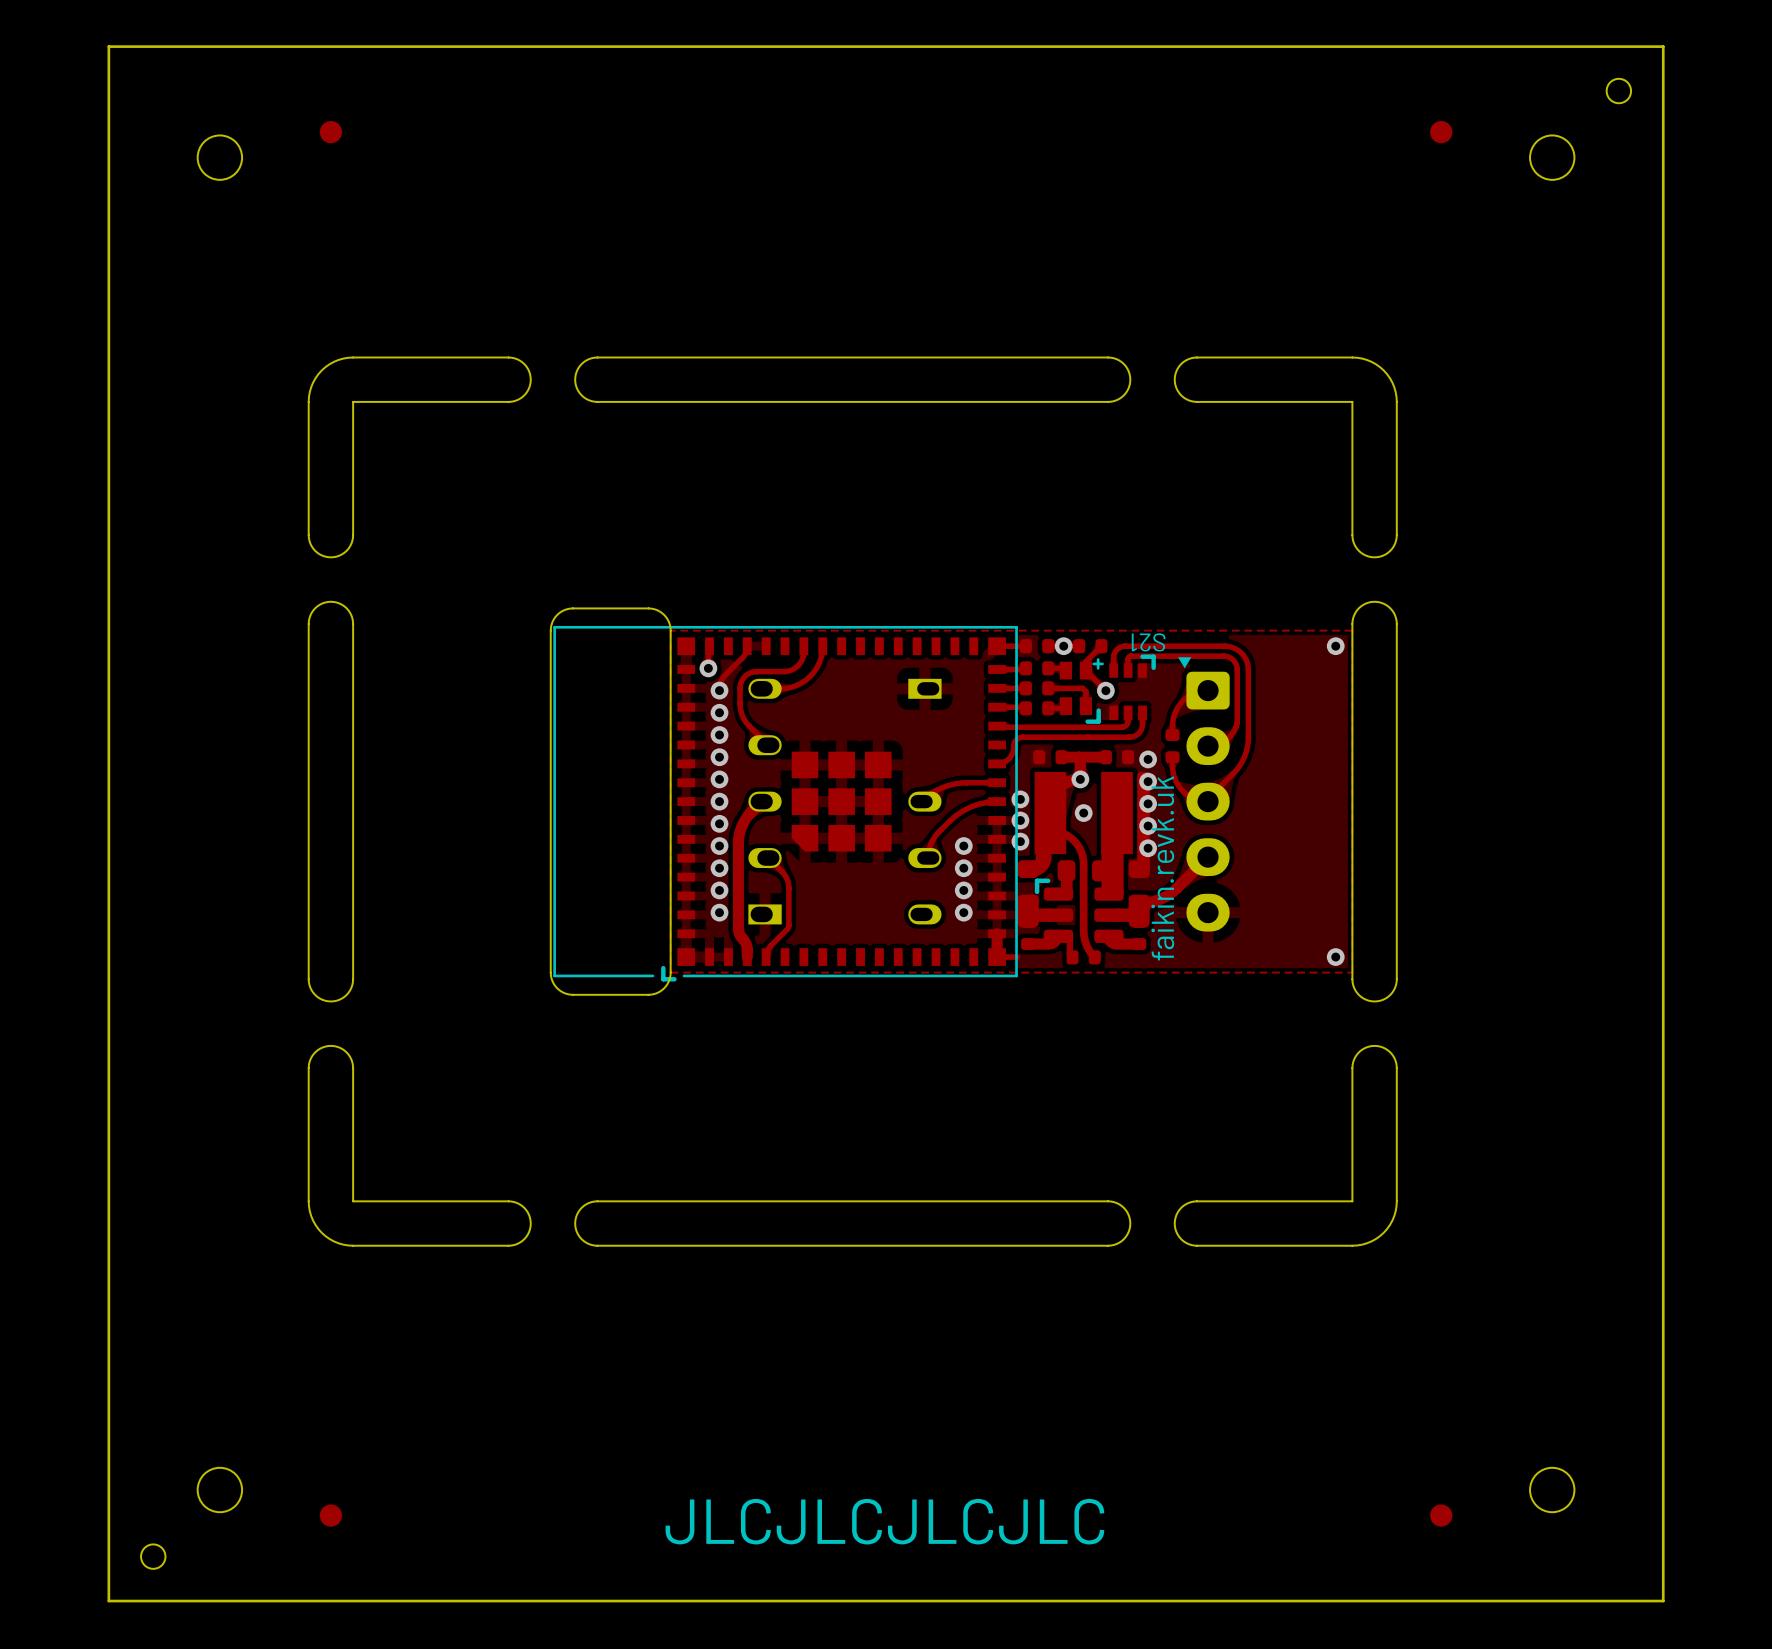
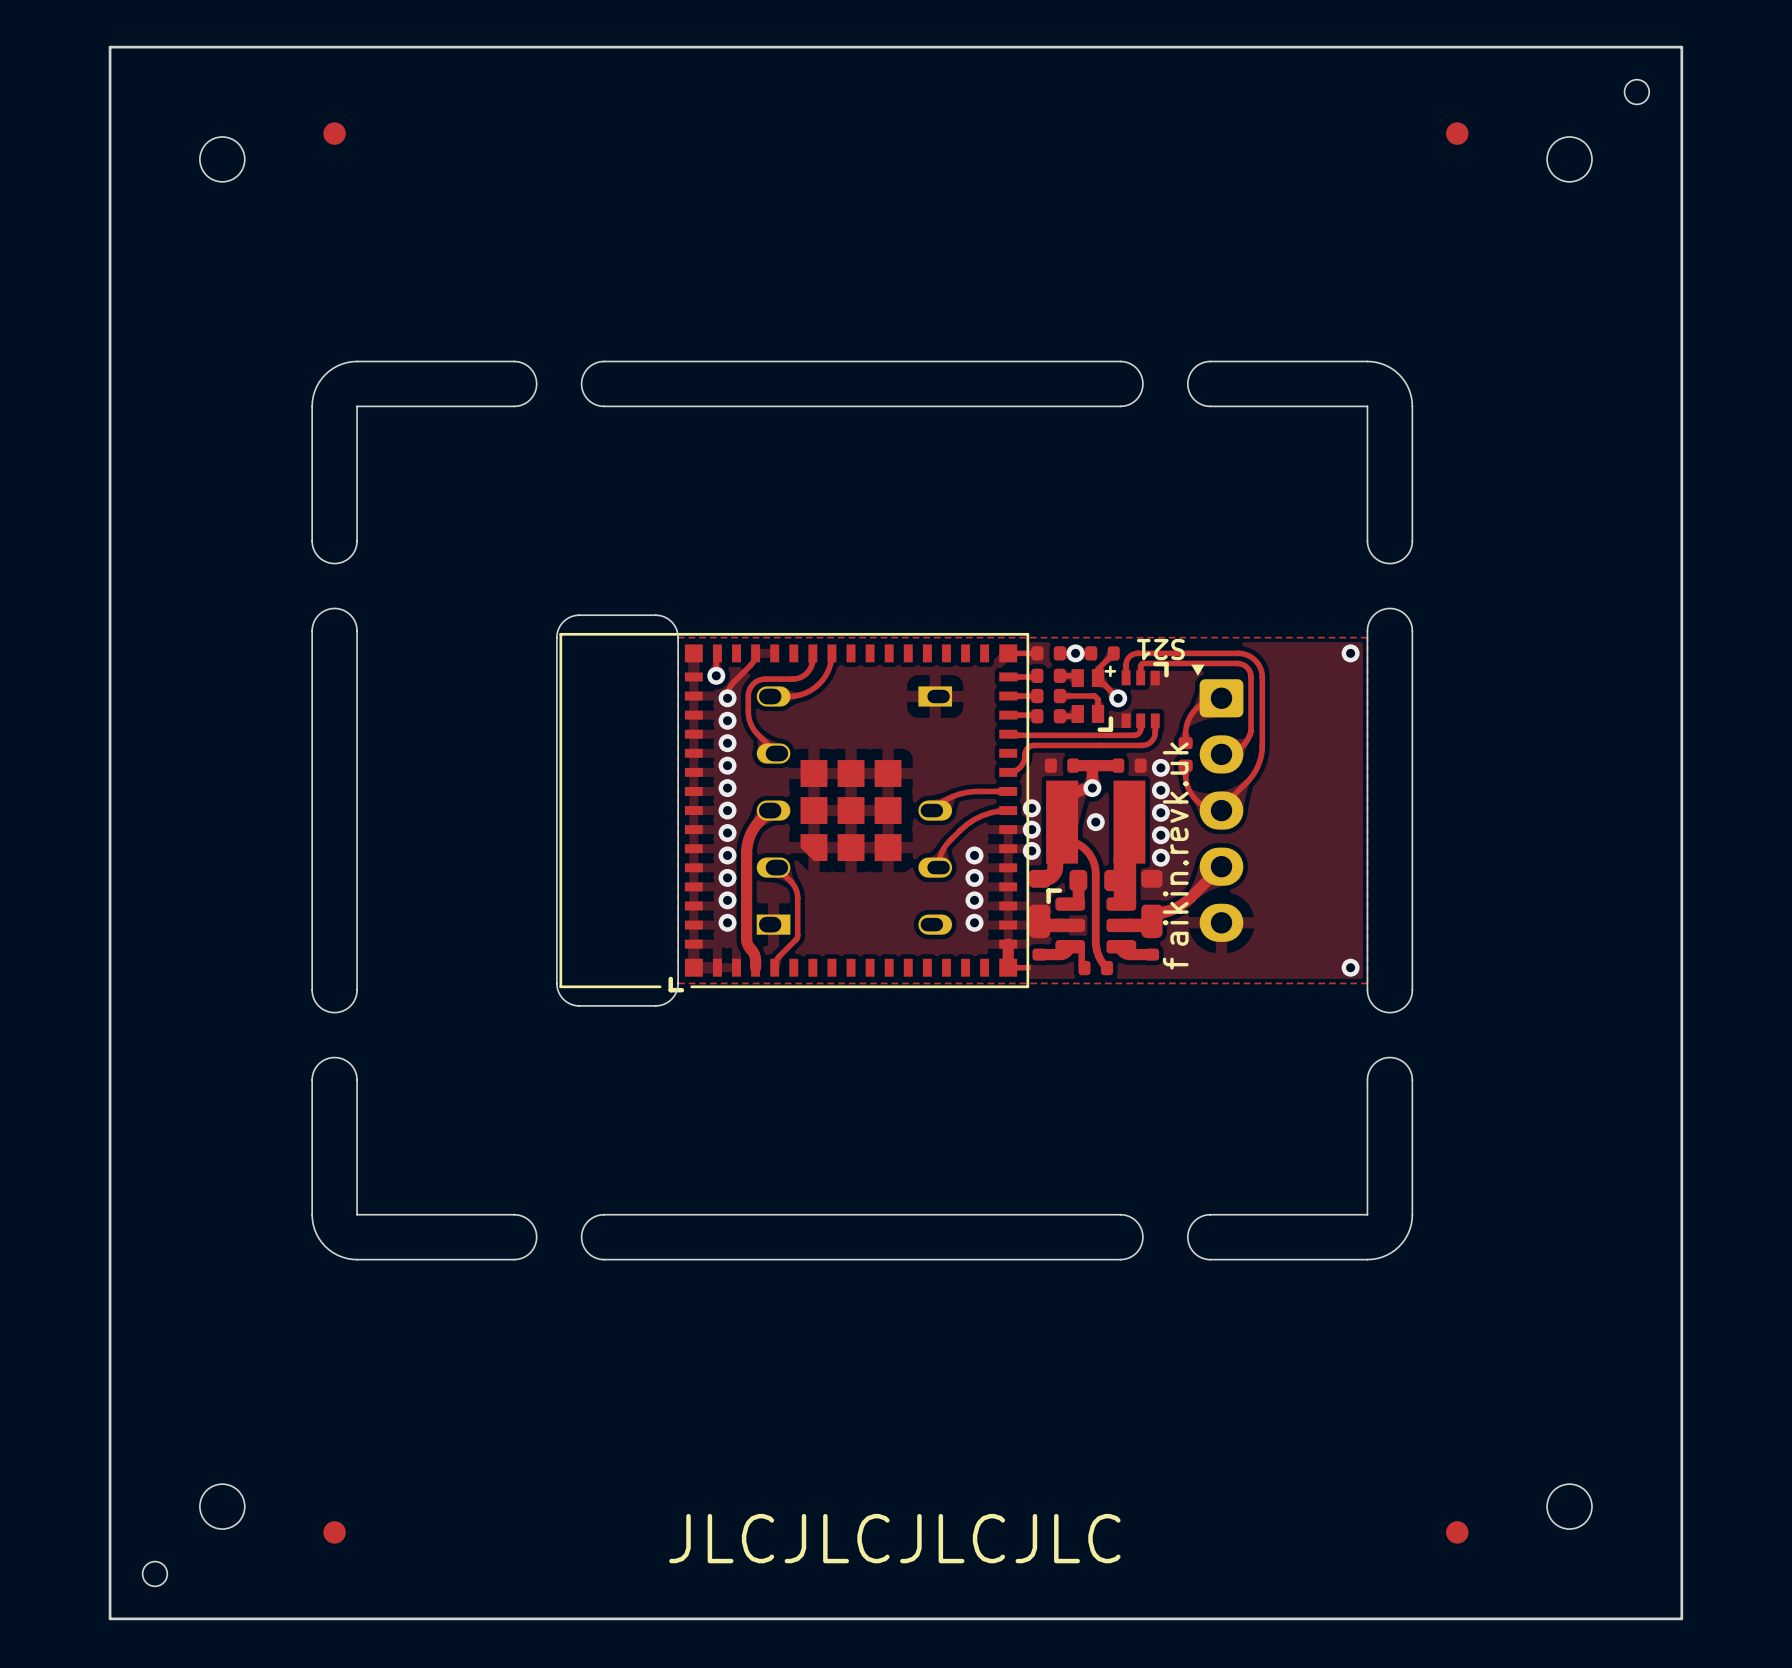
part footprint: [1017, 771, 1150, 965] -> [1028, 780, 1163, 976]

